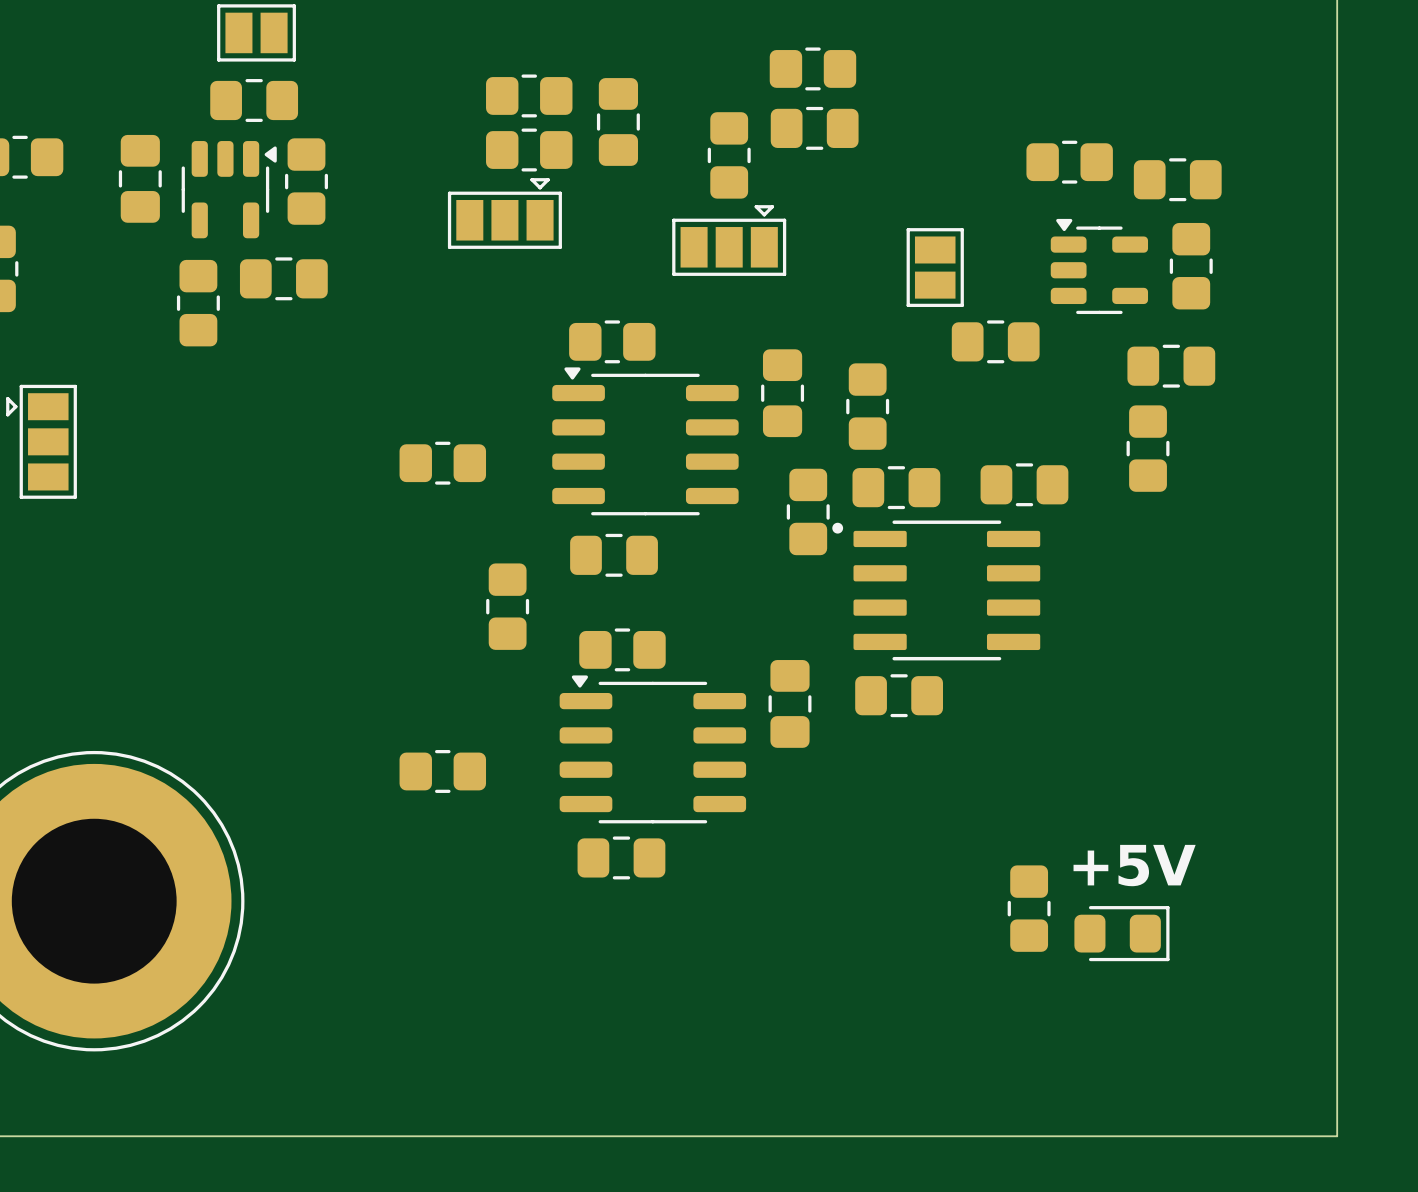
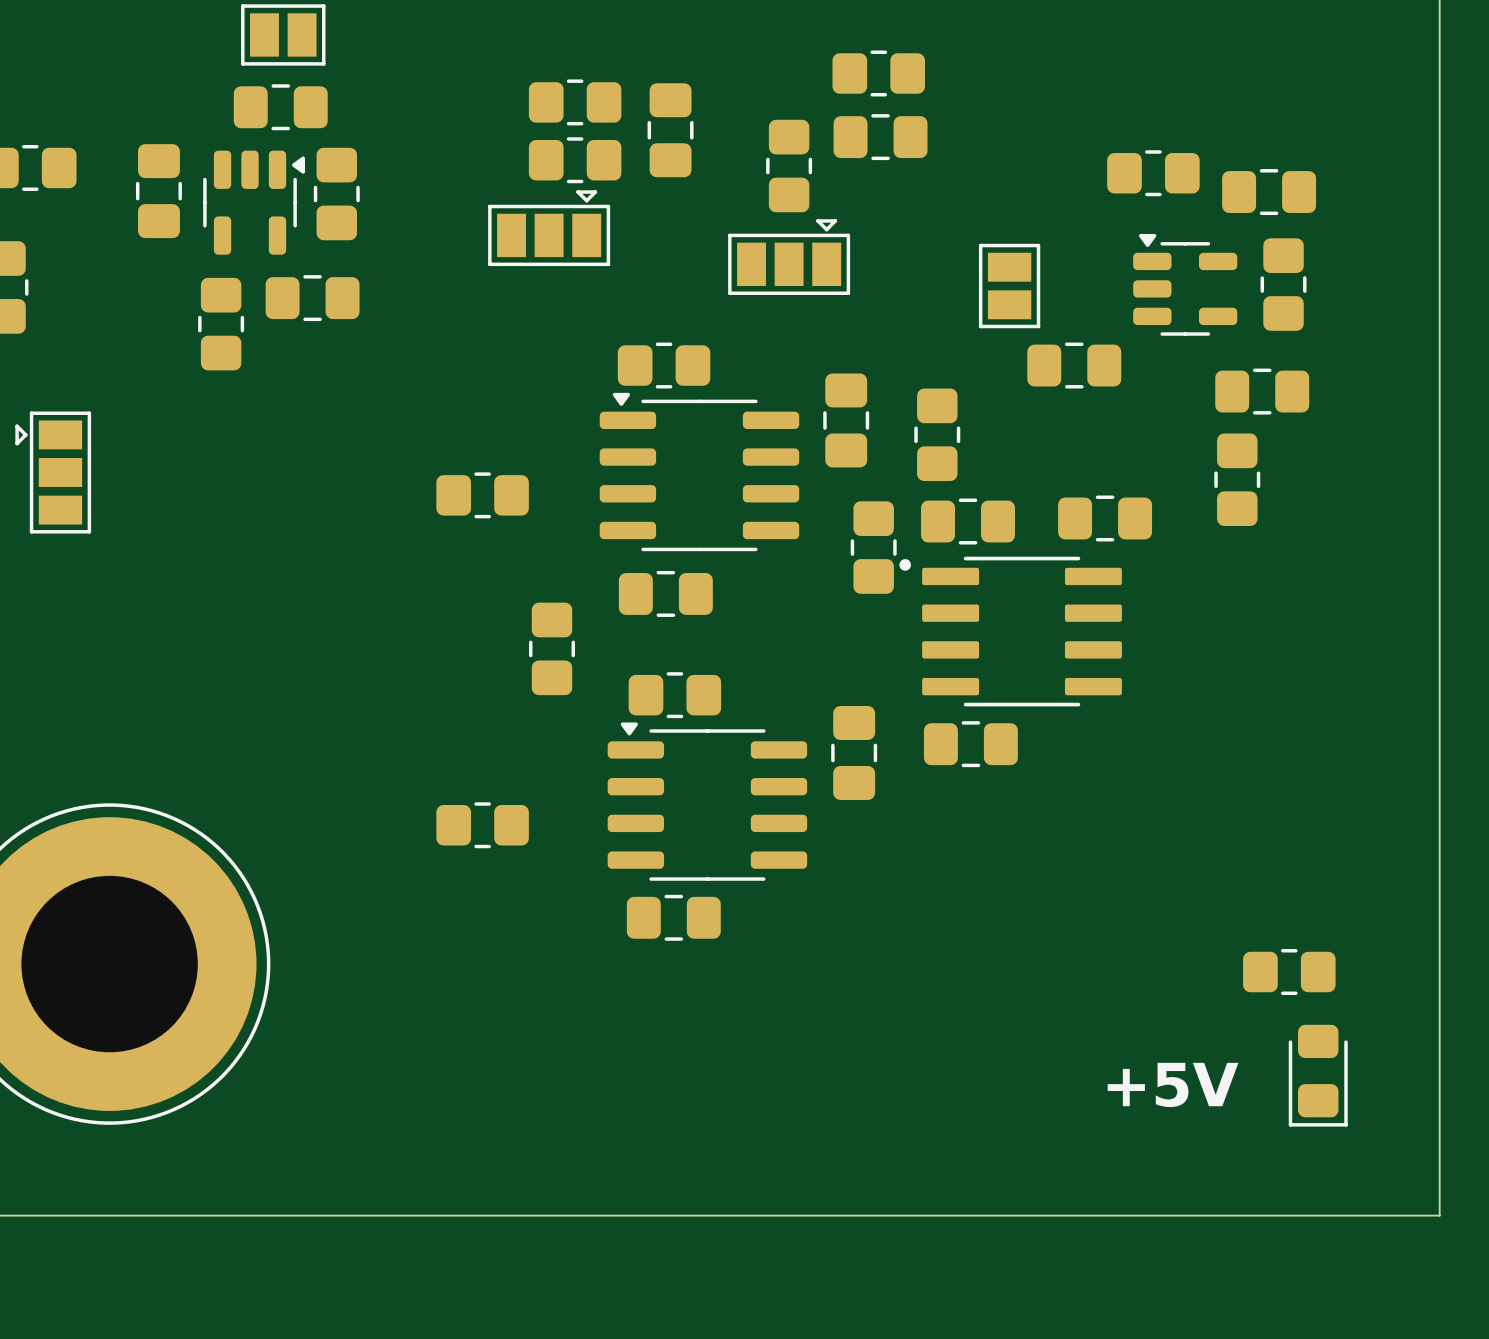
text position: +5V (1134, 865) -> +5V (1173, 1084)
part rotation: 0° (1029, 908) -> 90° clockwise (1289, 972)
part position: (1029, 908) -> (1289, 972)
part rotation: 0° (1121, 933) -> 90° clockwise (1318, 1075)
part position: (1121, 933) -> (1318, 1075)

